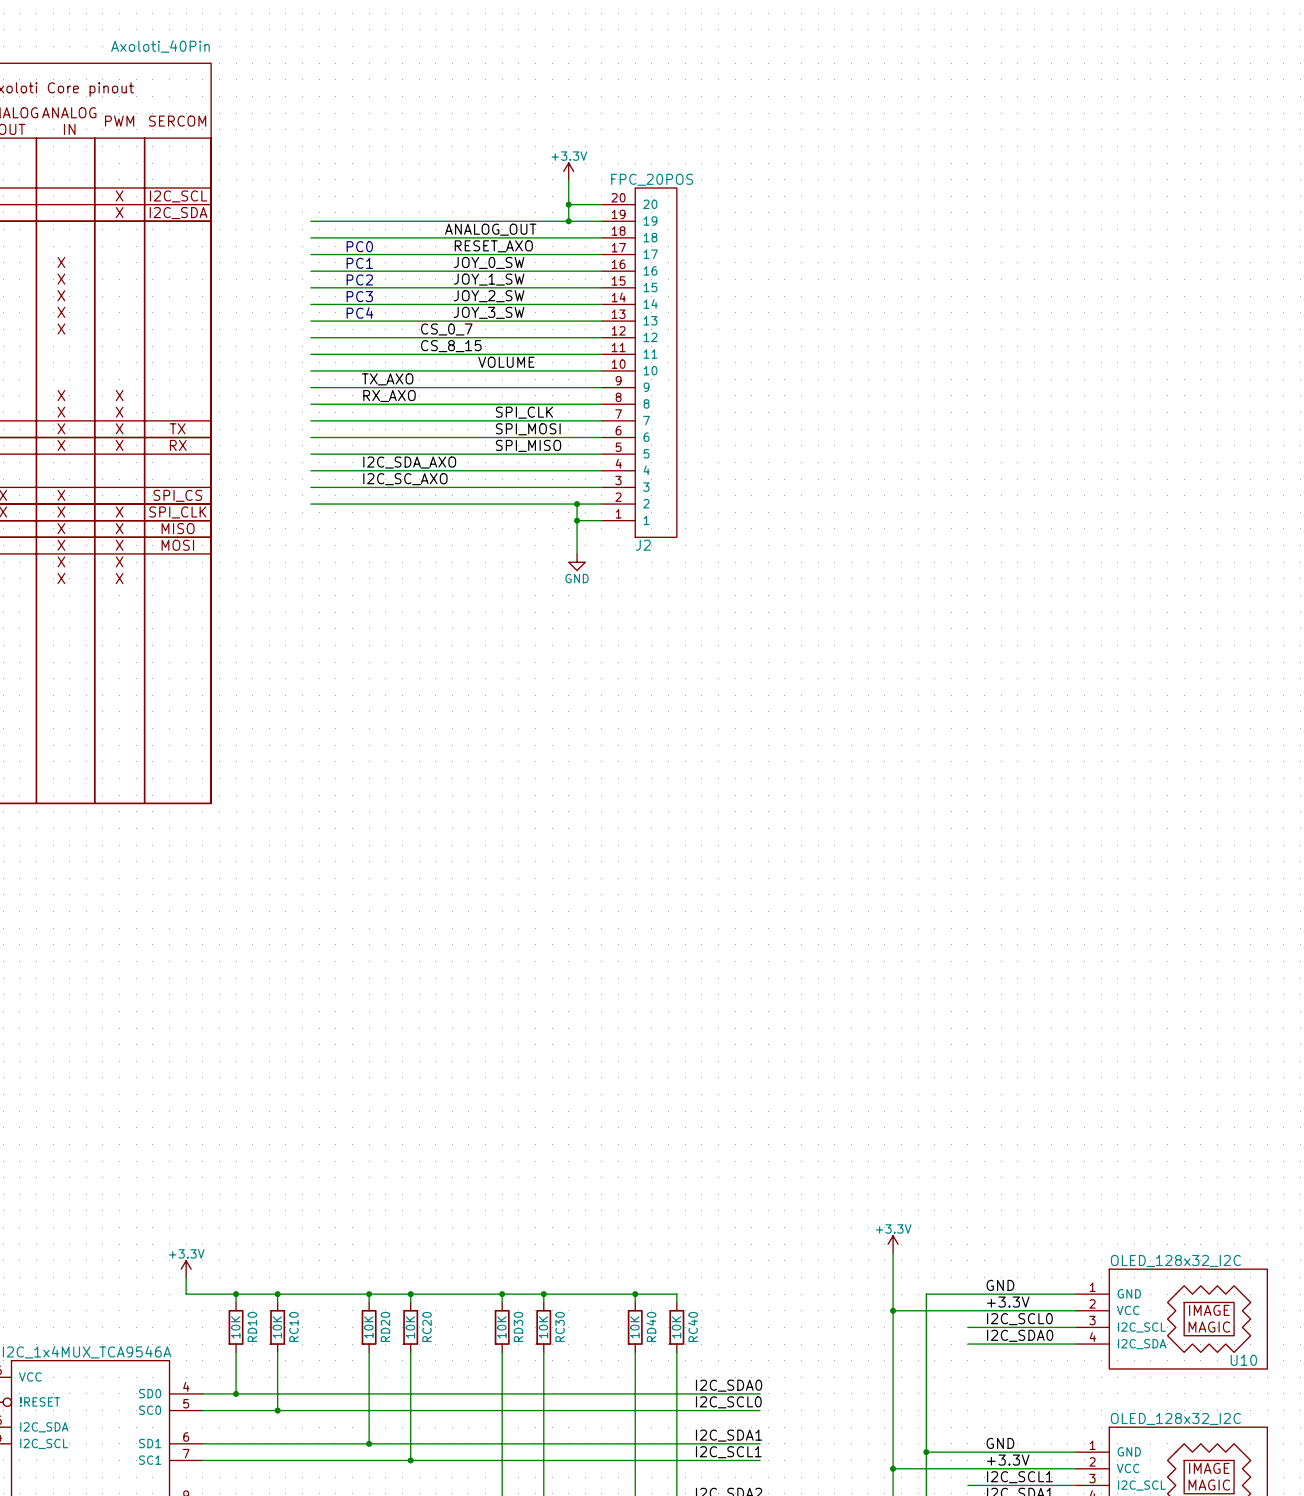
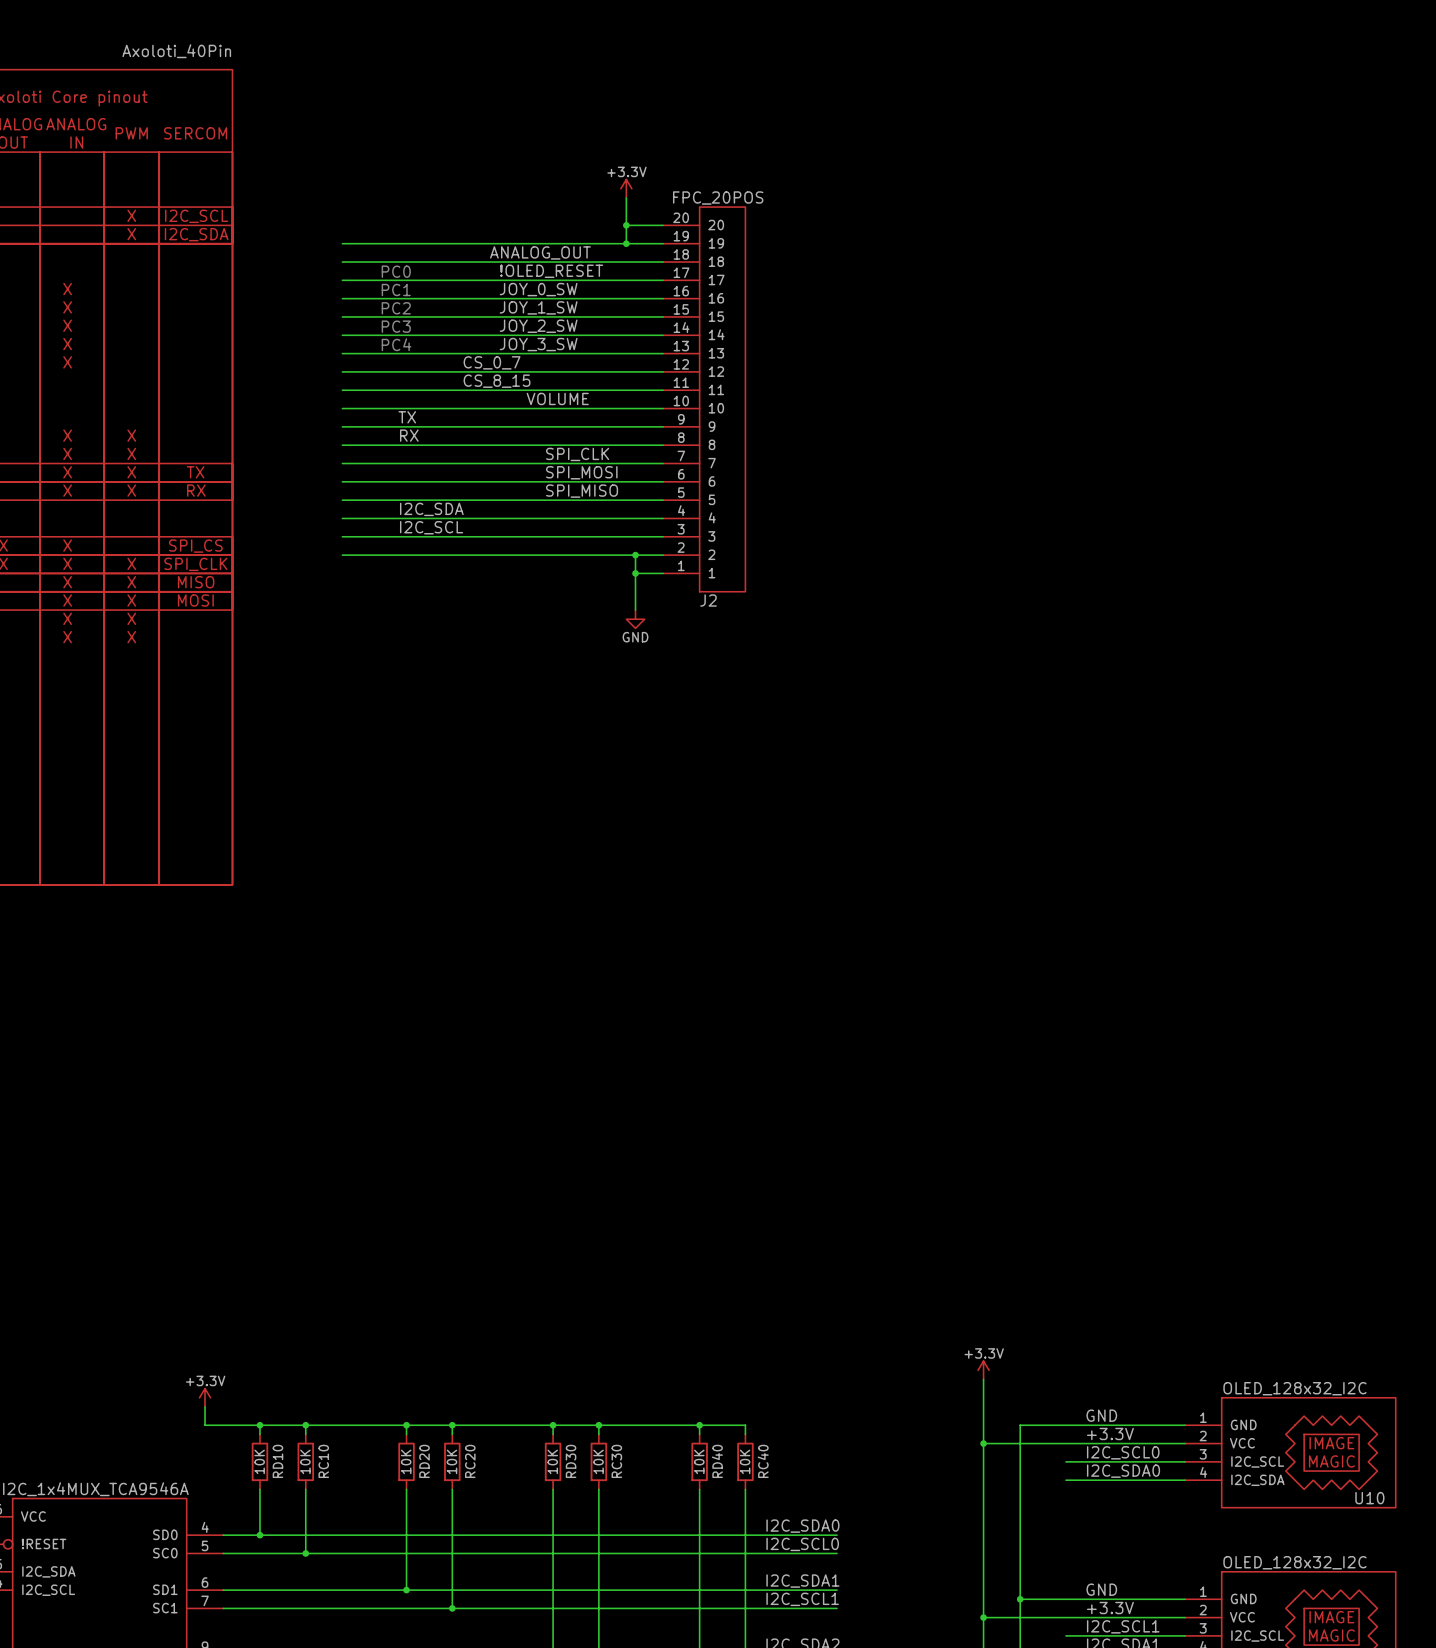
label: RESET_AXO (493, 246) -> !OLED_RESET (551, 271)
label: TX_AXO (387, 379) -> TX (407, 417)
label: RX_AXO (389, 396) -> RX (409, 435)
label: I2C_SDA_AXO (409, 462) -> I2C_SDA (431, 509)
label: I2C_SC_AXO (405, 479) -> I2C_SCL (431, 527)

